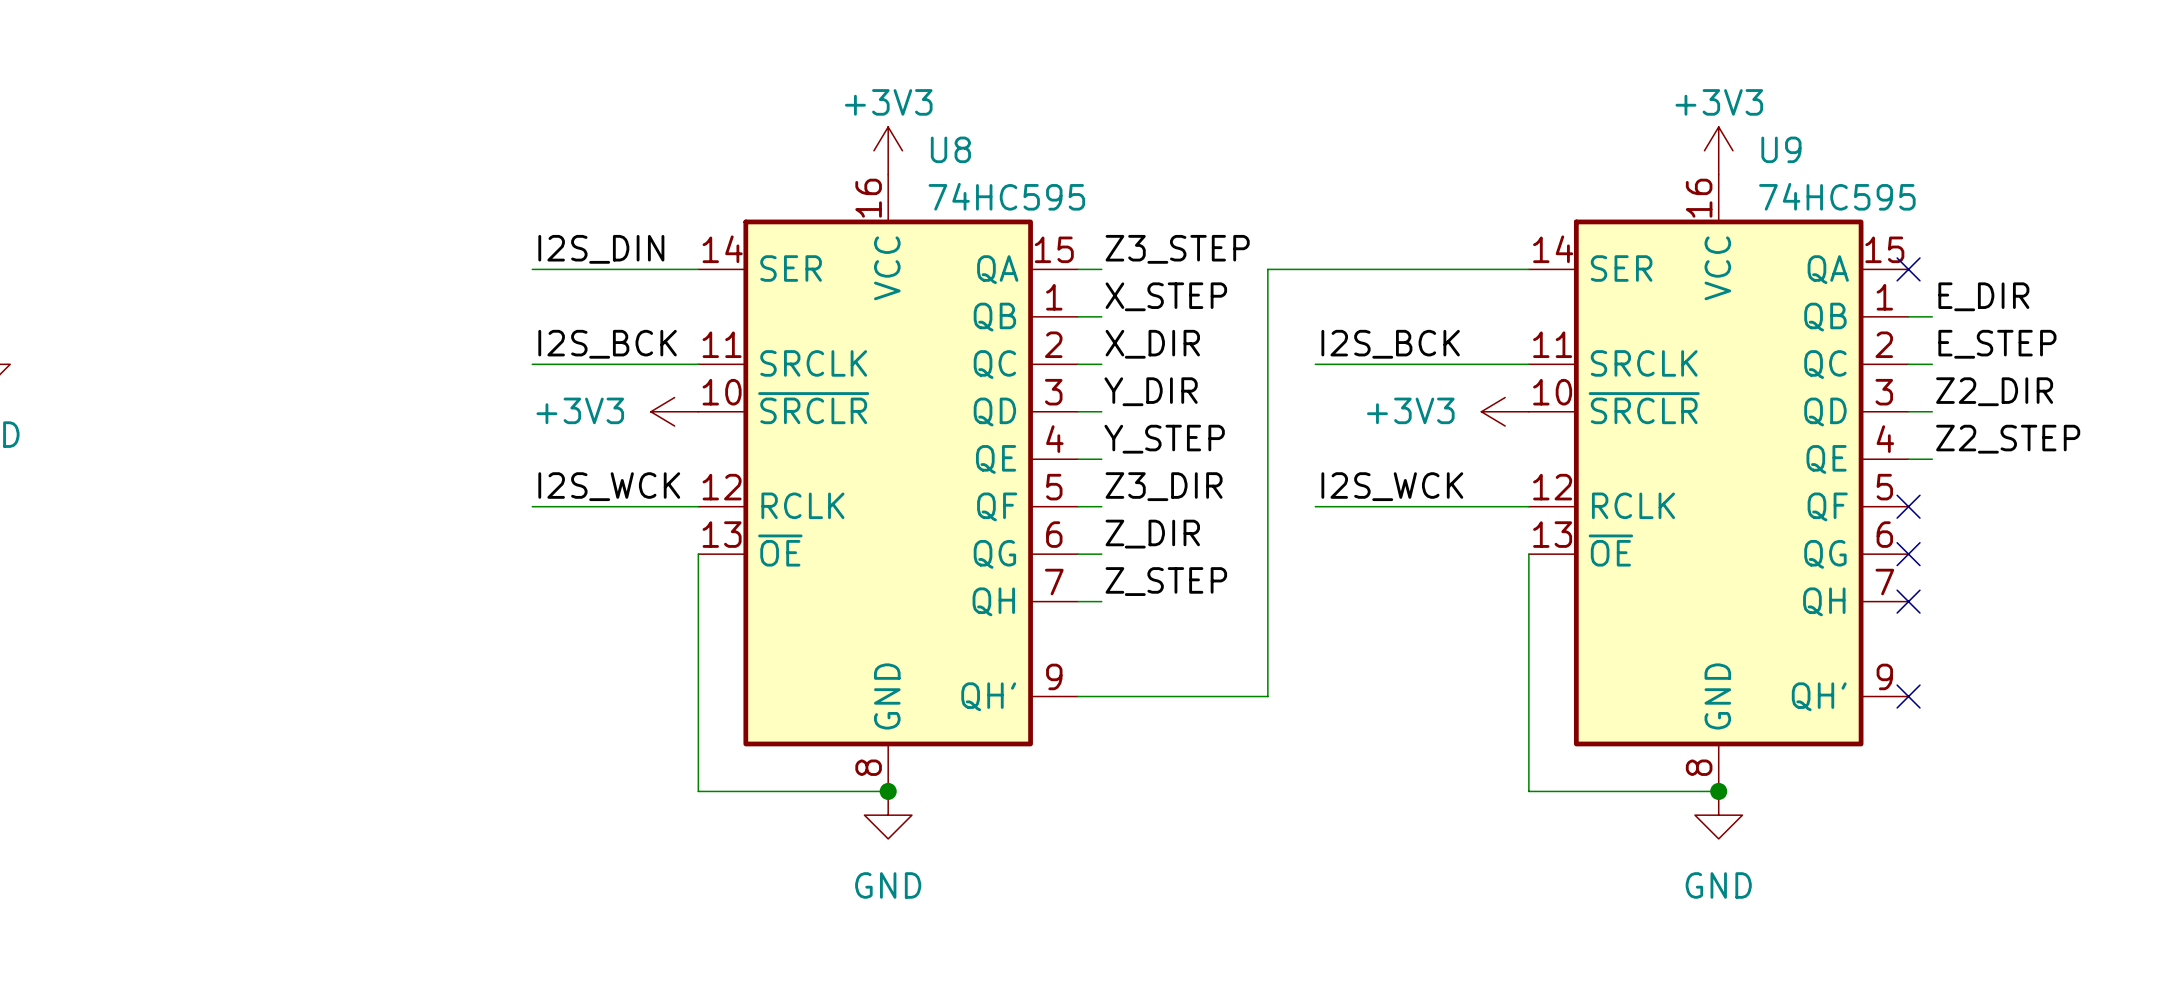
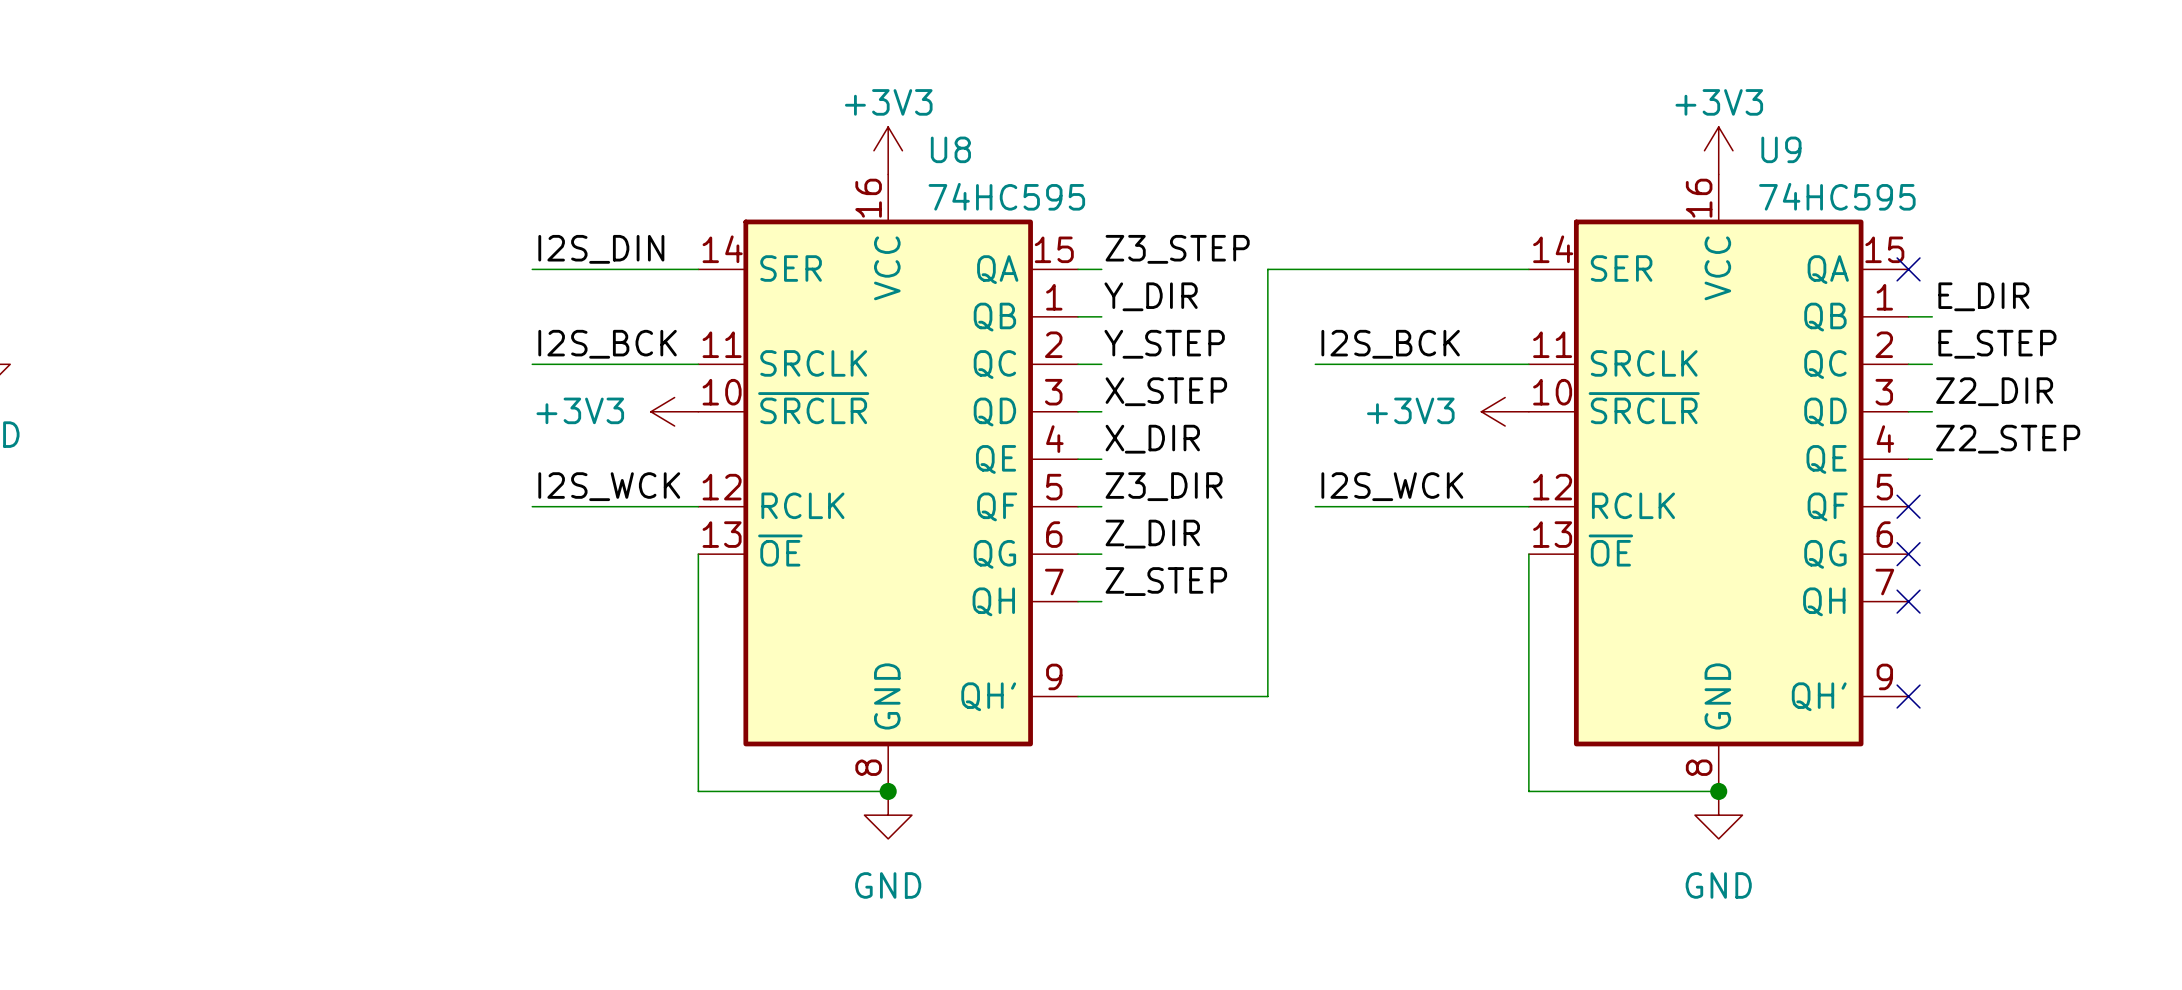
label: X_STEP (1166, 296) -> Y_DIR (1151, 296)
label: X_DIR (1152, 344) -> Y_STEP (1164, 344)
label: Y_DIR (1151, 391) -> X_STEP (1166, 391)
label: Y_STEP (1164, 439) -> X_DIR (1152, 439)

